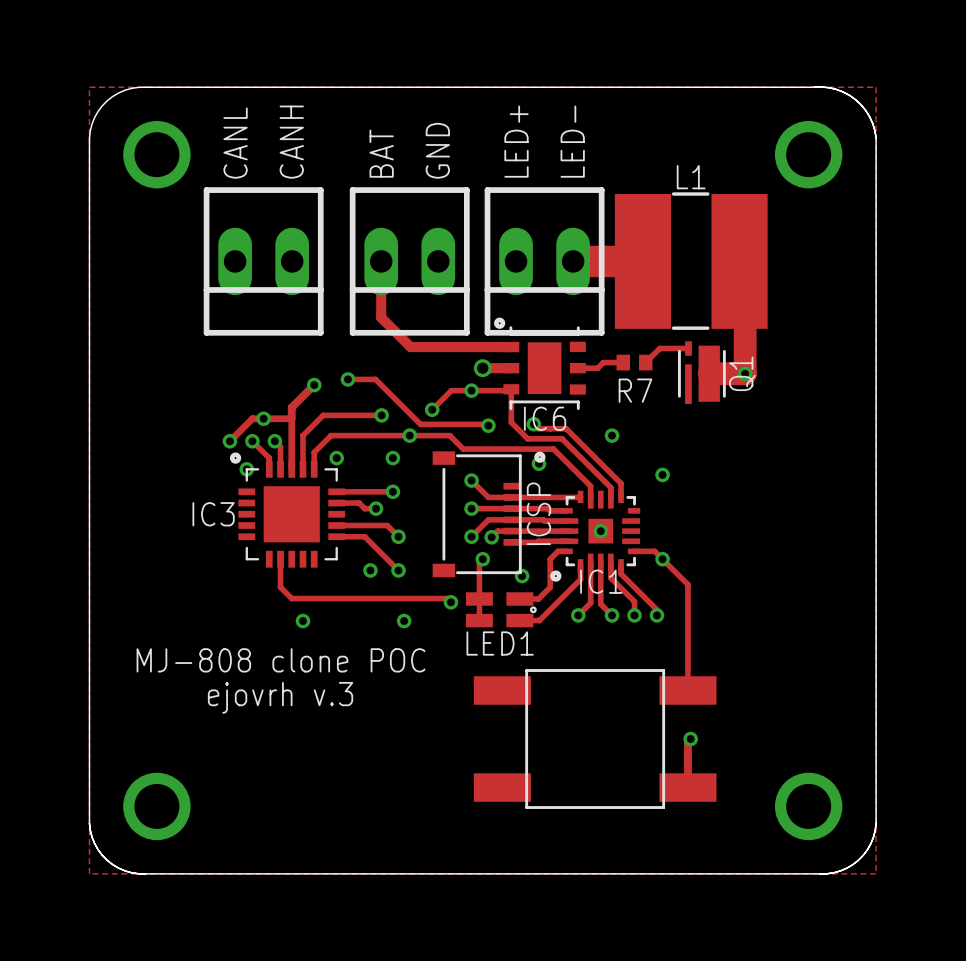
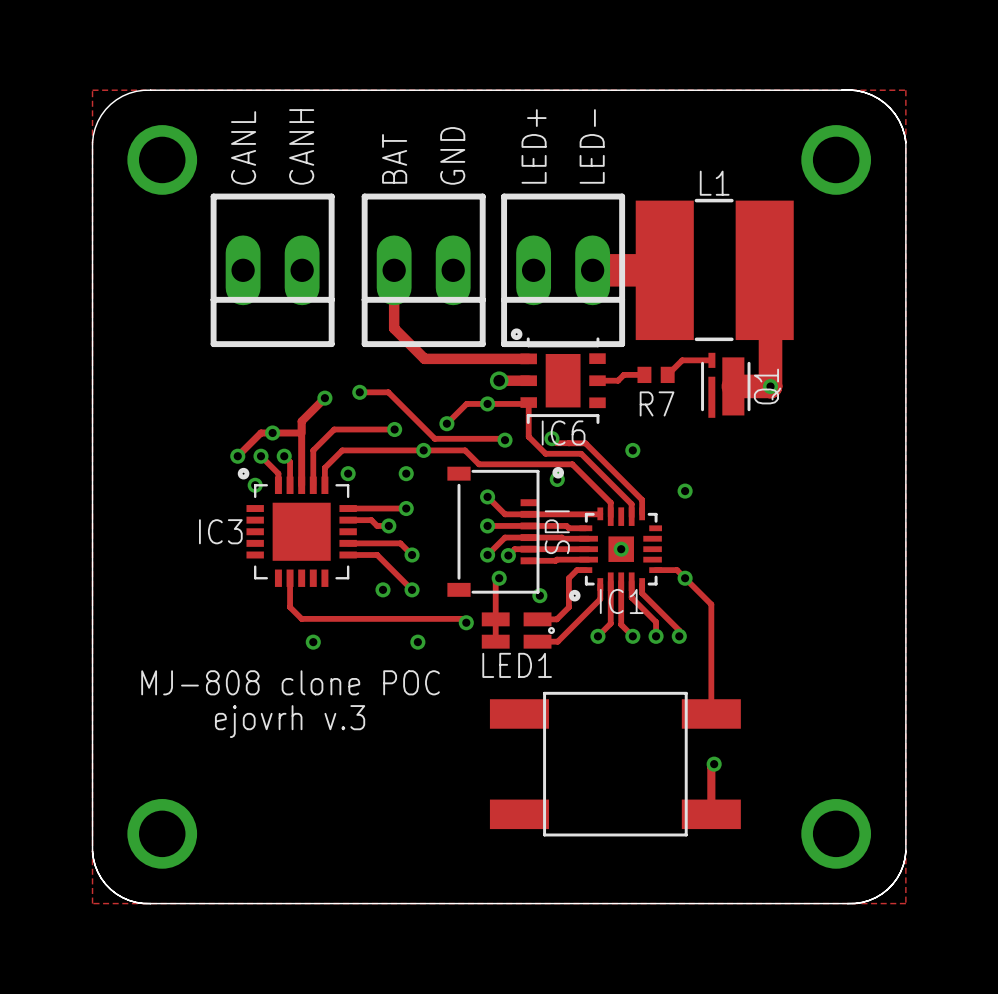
ICSP name: ICSP (538, 513) -> SPI (557, 532)

